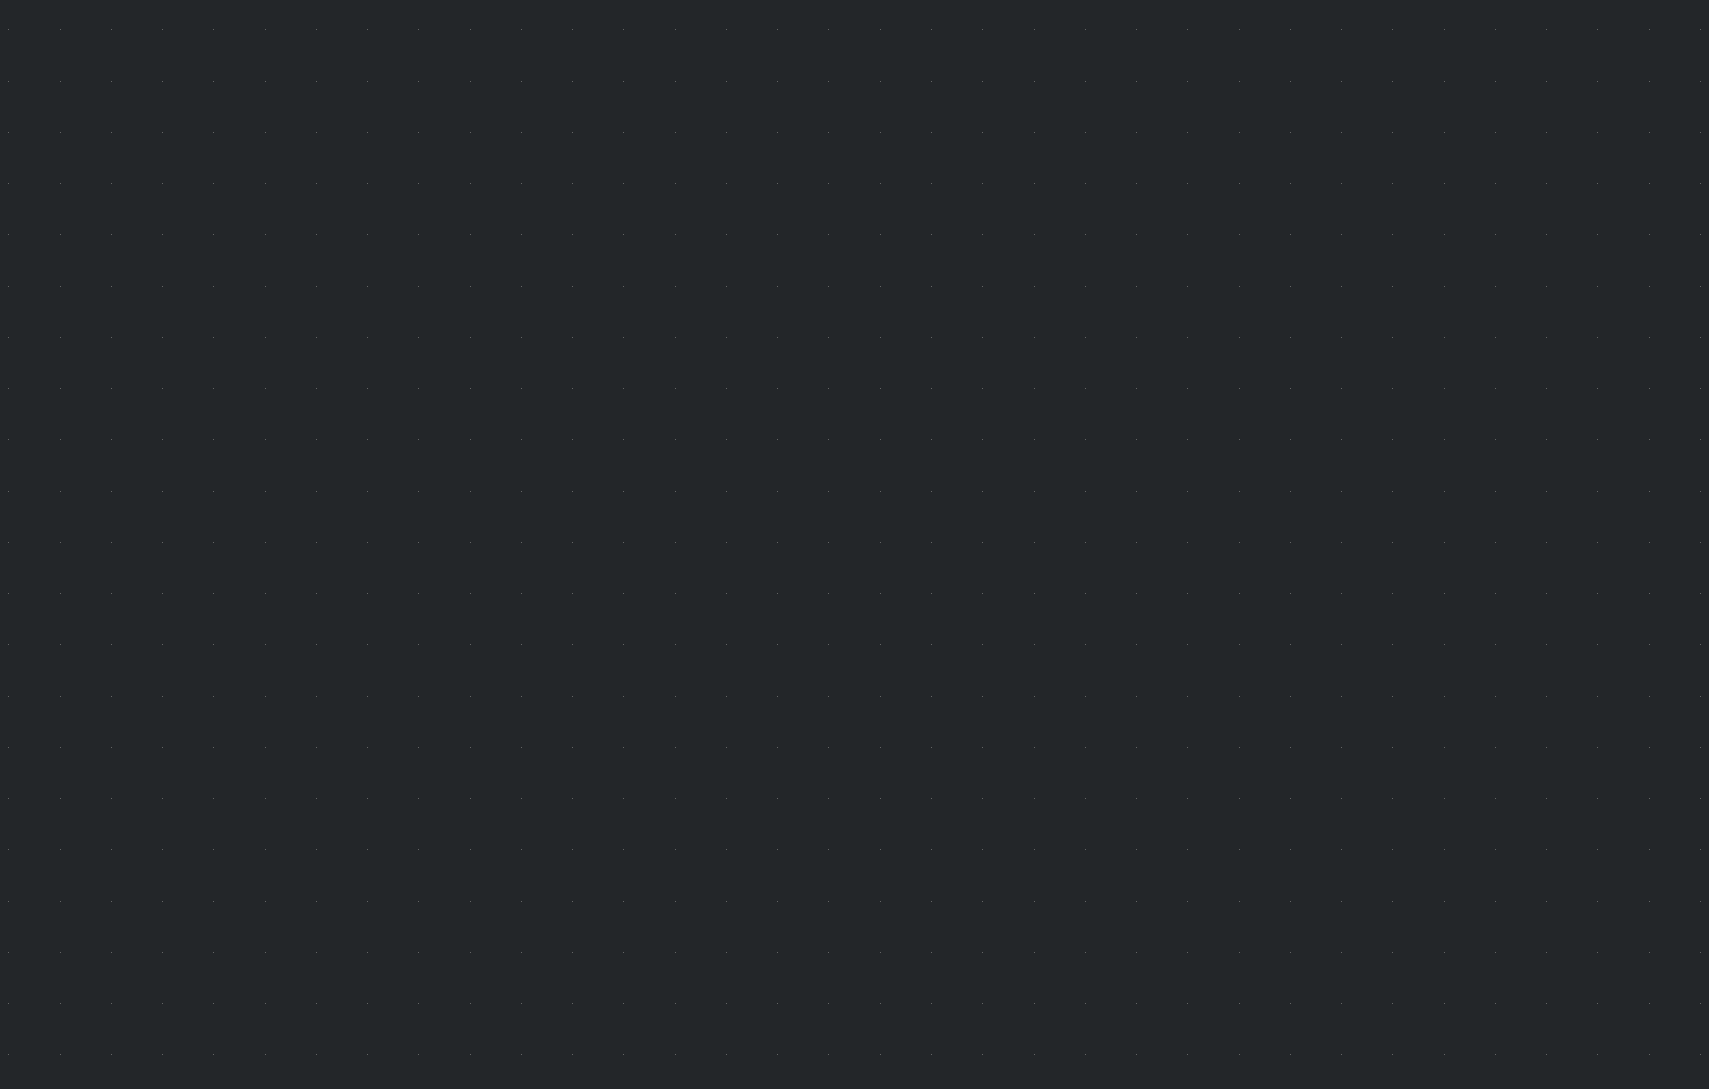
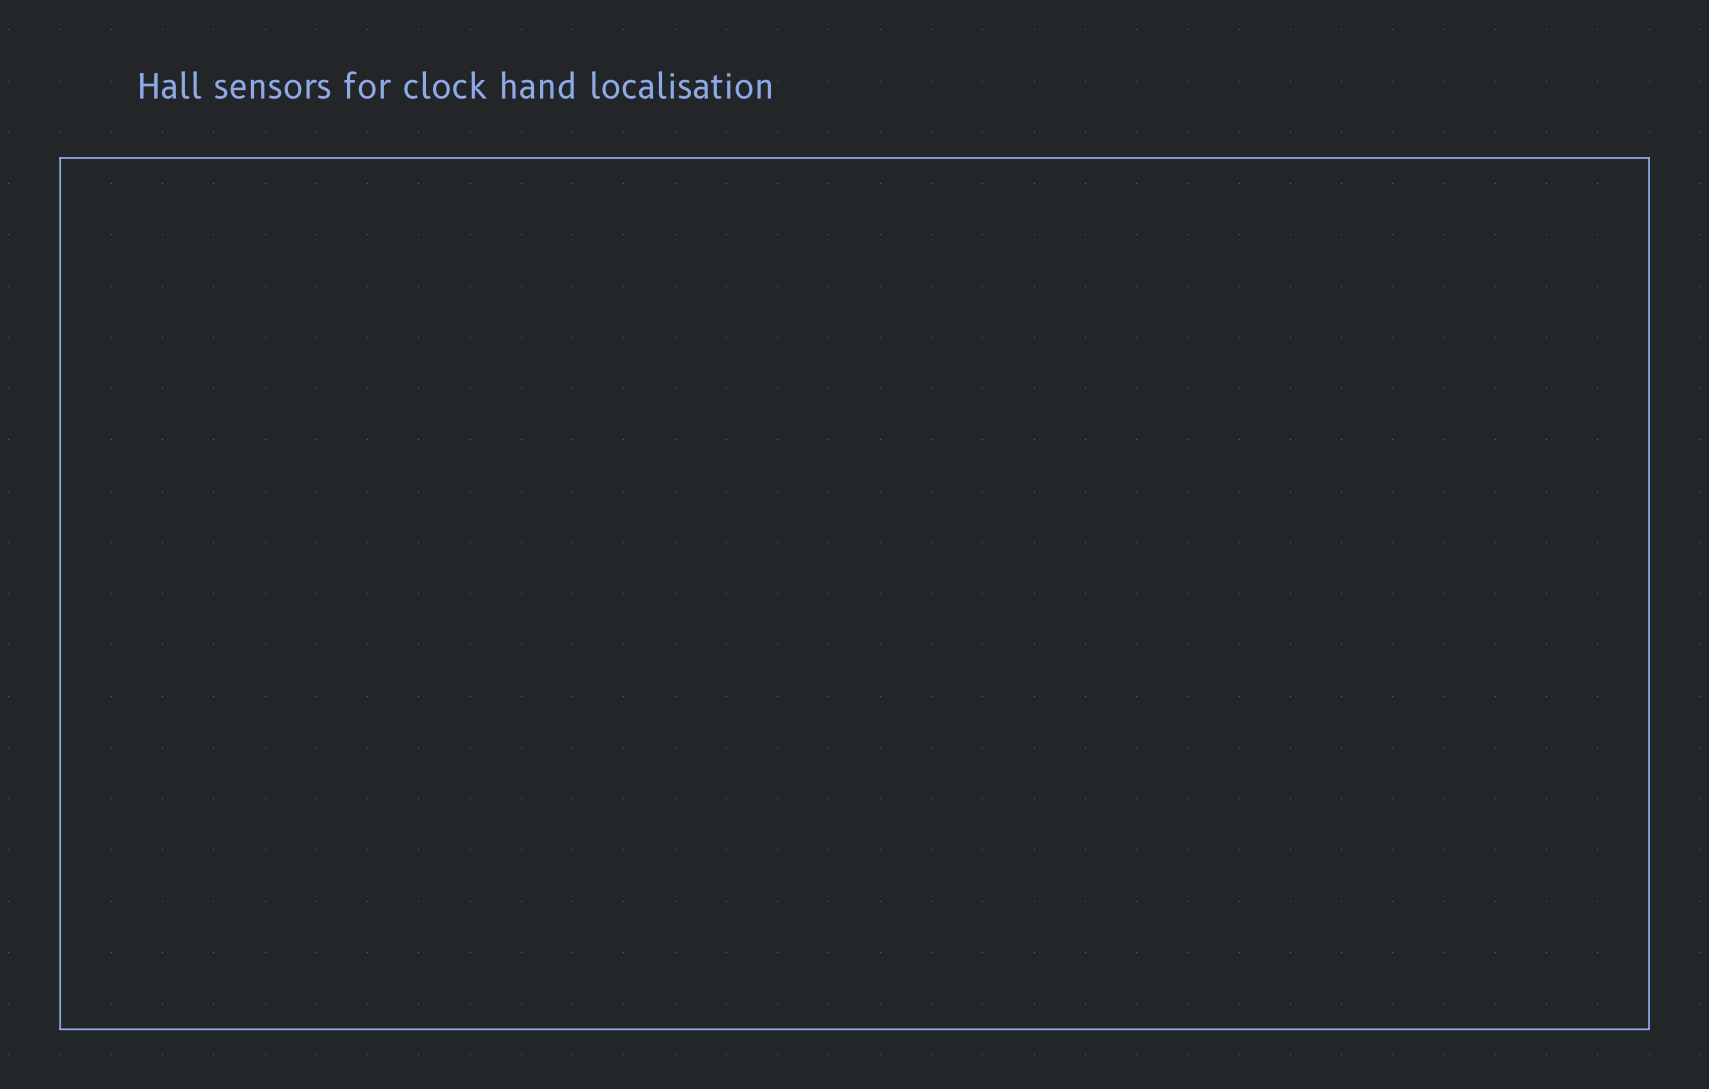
text: none -> Hall sensors for clock hand localisation (455, 85)
line: none -> (60, 157) (1649, 157) (1649, 1029) (60, 1029) (60, 157)

